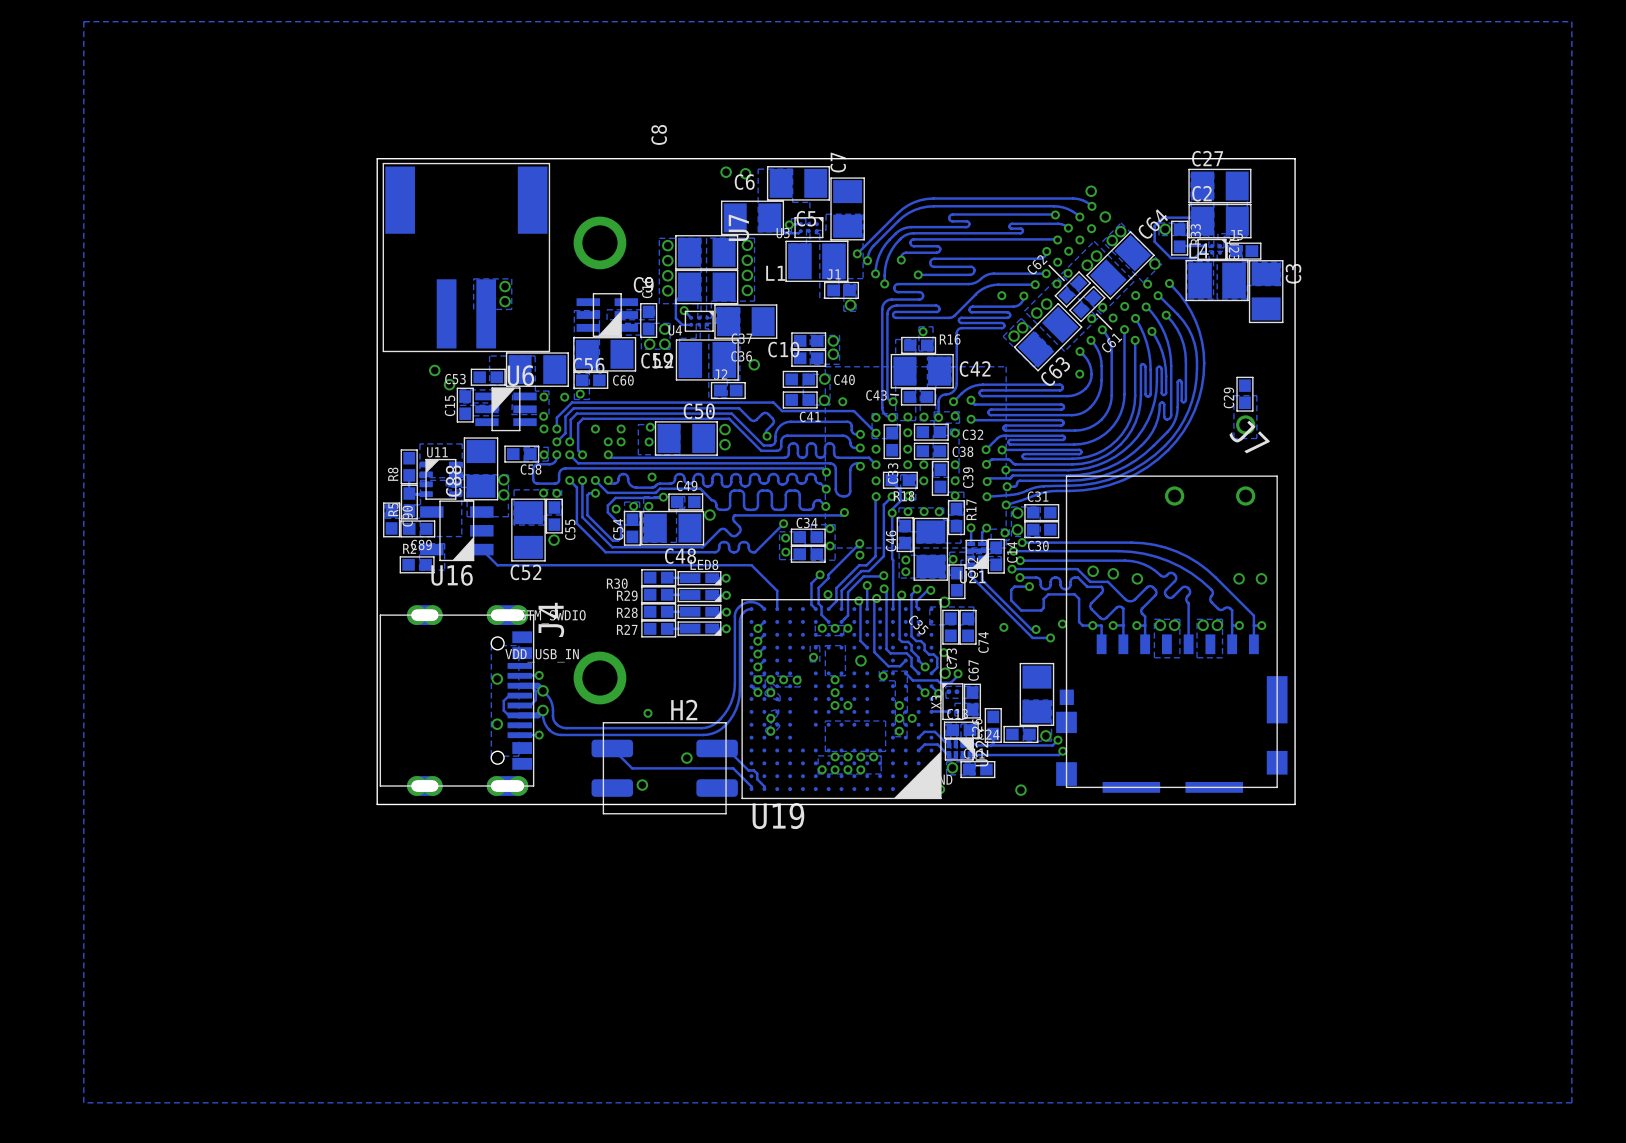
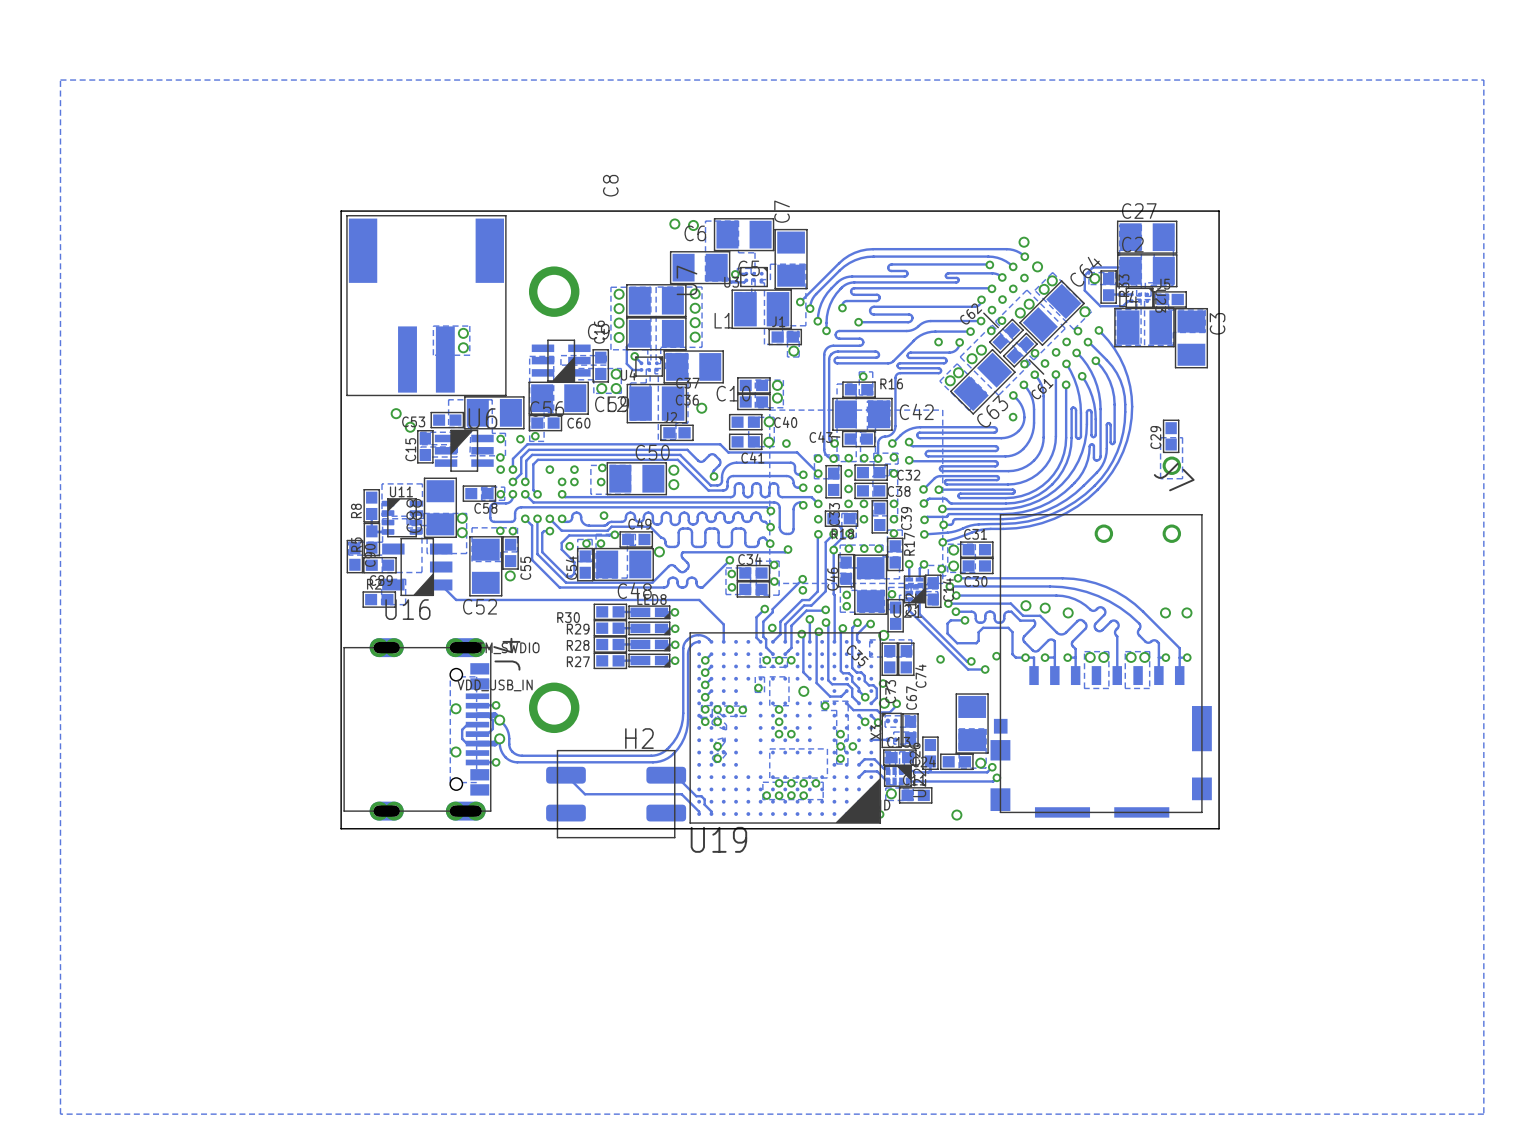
via: (647, 713) -> none
via: (686, 758) -> none
via: (642, 785) -> none

